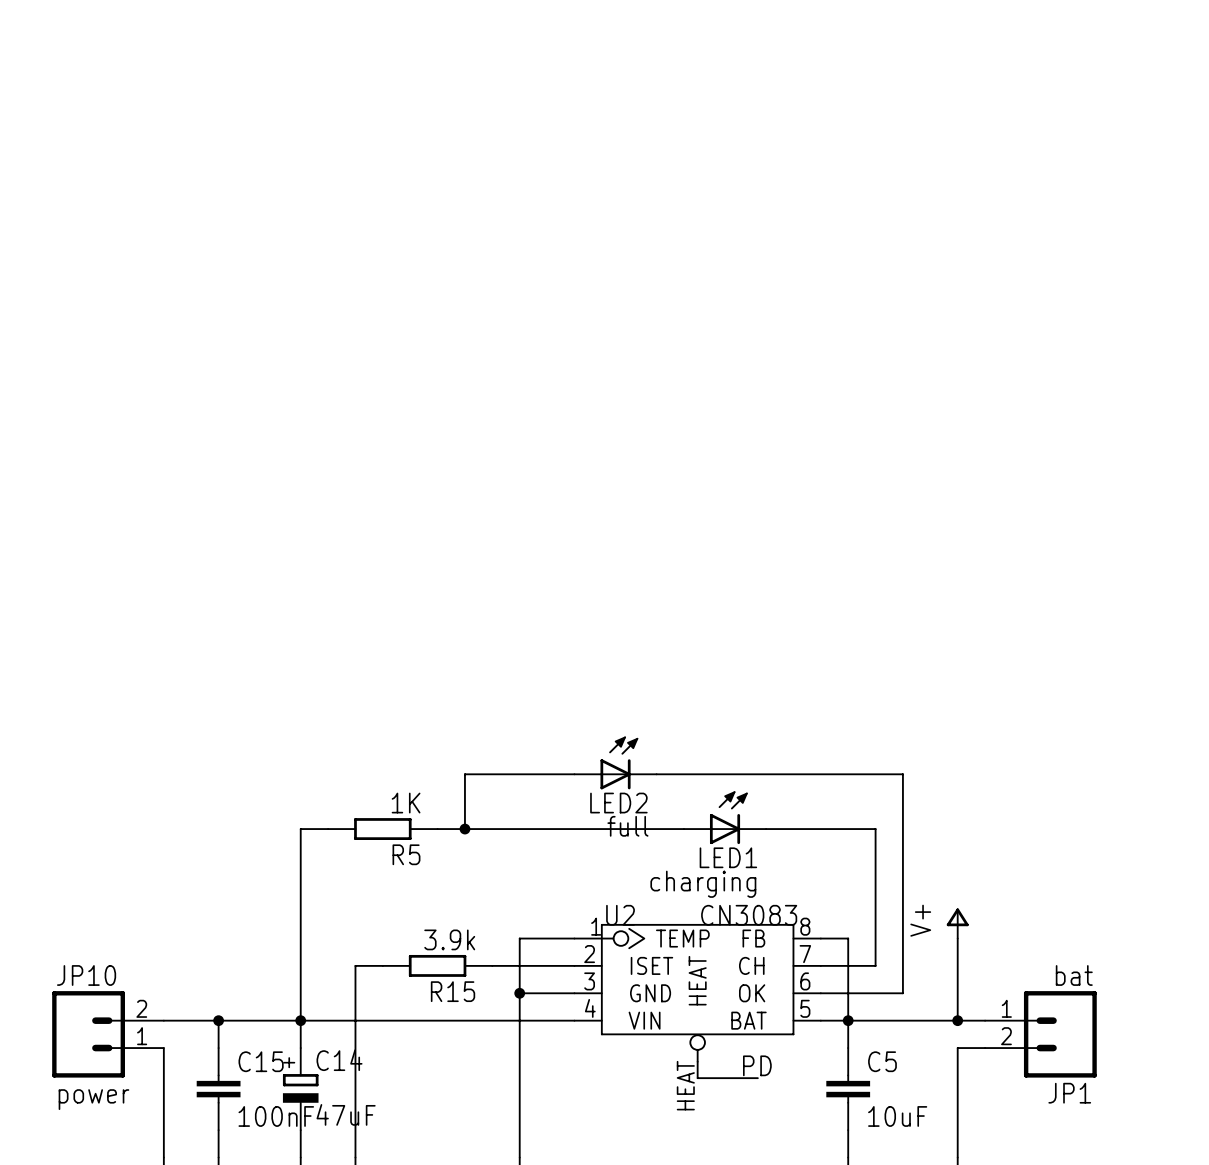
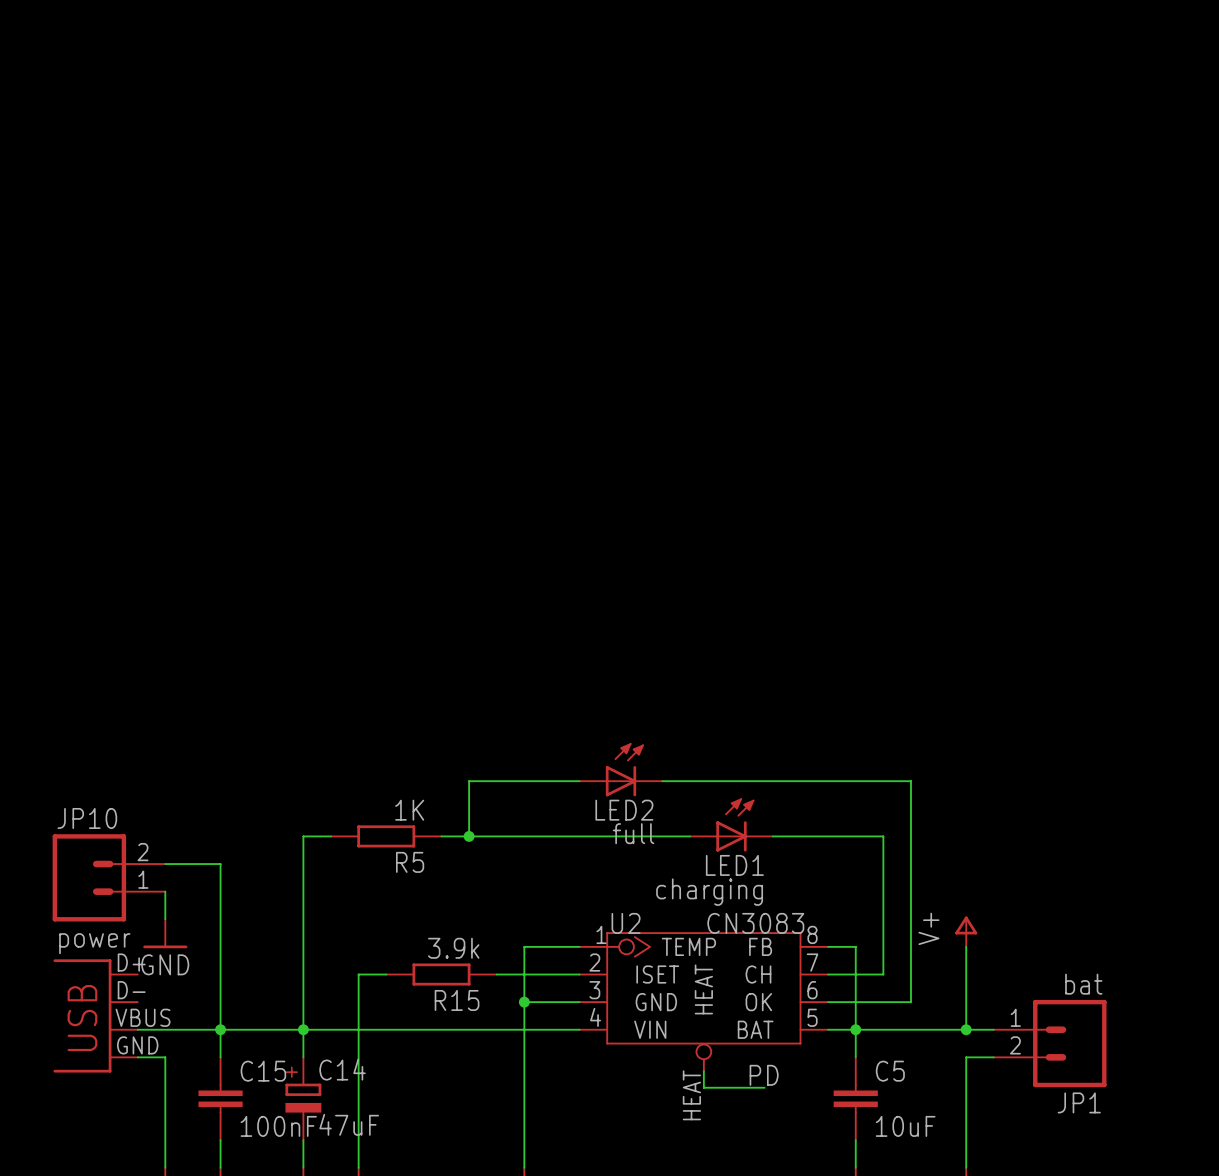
wire: none -> (165, 864) (220, 864) (220, 1029)
wire: none -> (165, 891) (165, 919)
power symbol: none -> GND (165, 933)
part: none -> (95, 1015)
JP10 position: (108, 1034) -> (108, 877)

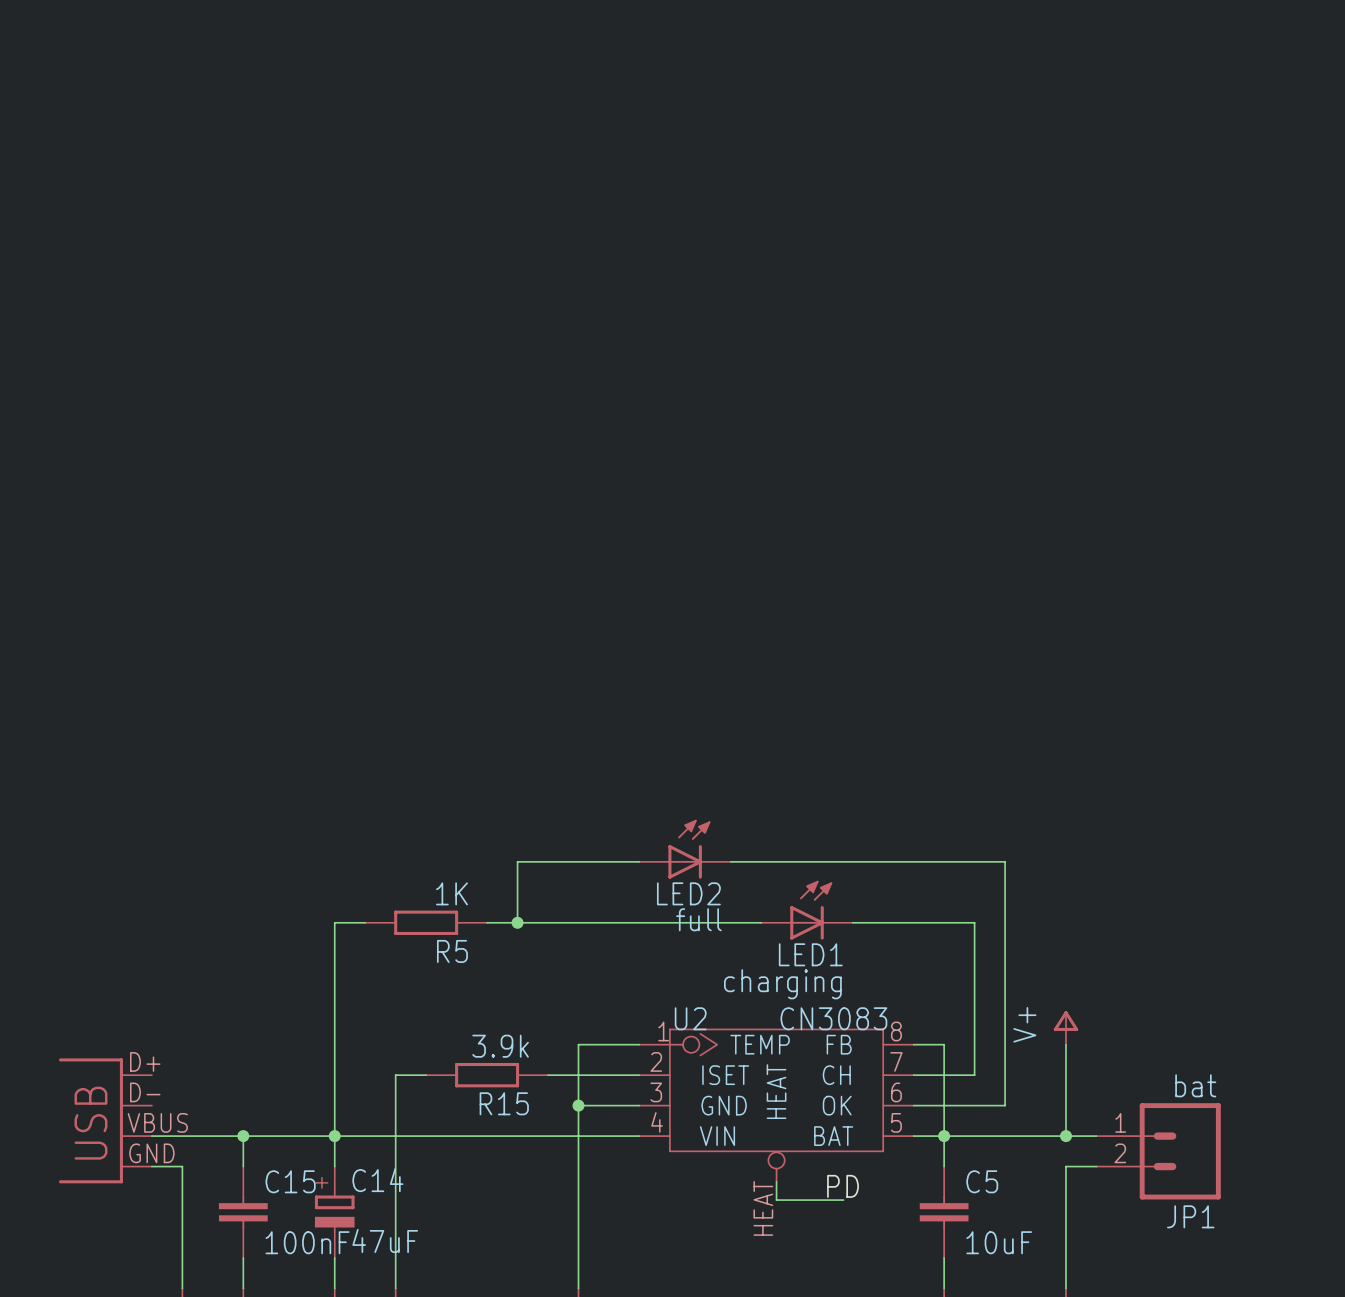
wire: (165, 864) (220, 864) (220, 1029) -> none
JP10: power (108, 877) -> none
wire: (165, 891) (165, 919) -> none
power symbol: GND (165, 933) -> none

